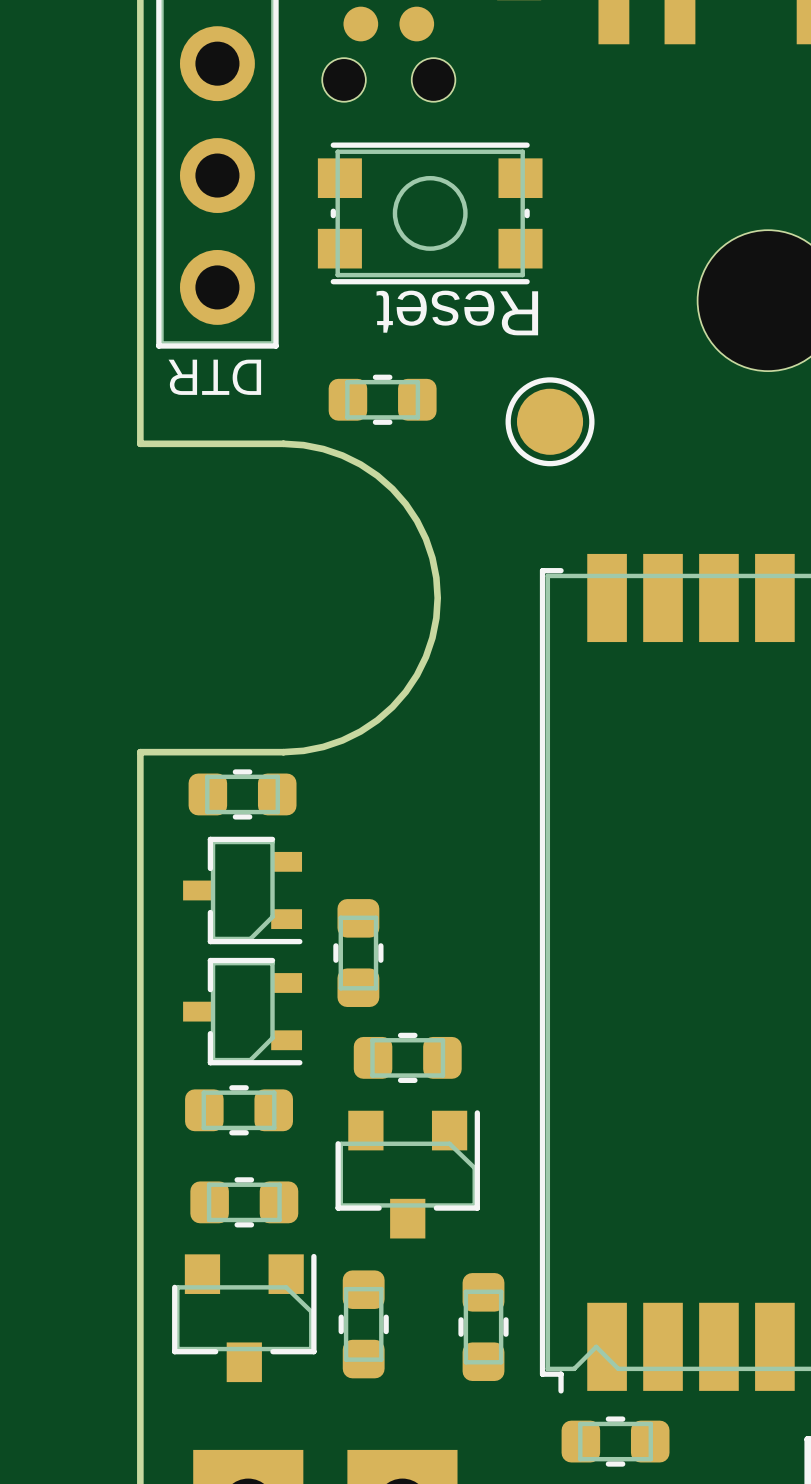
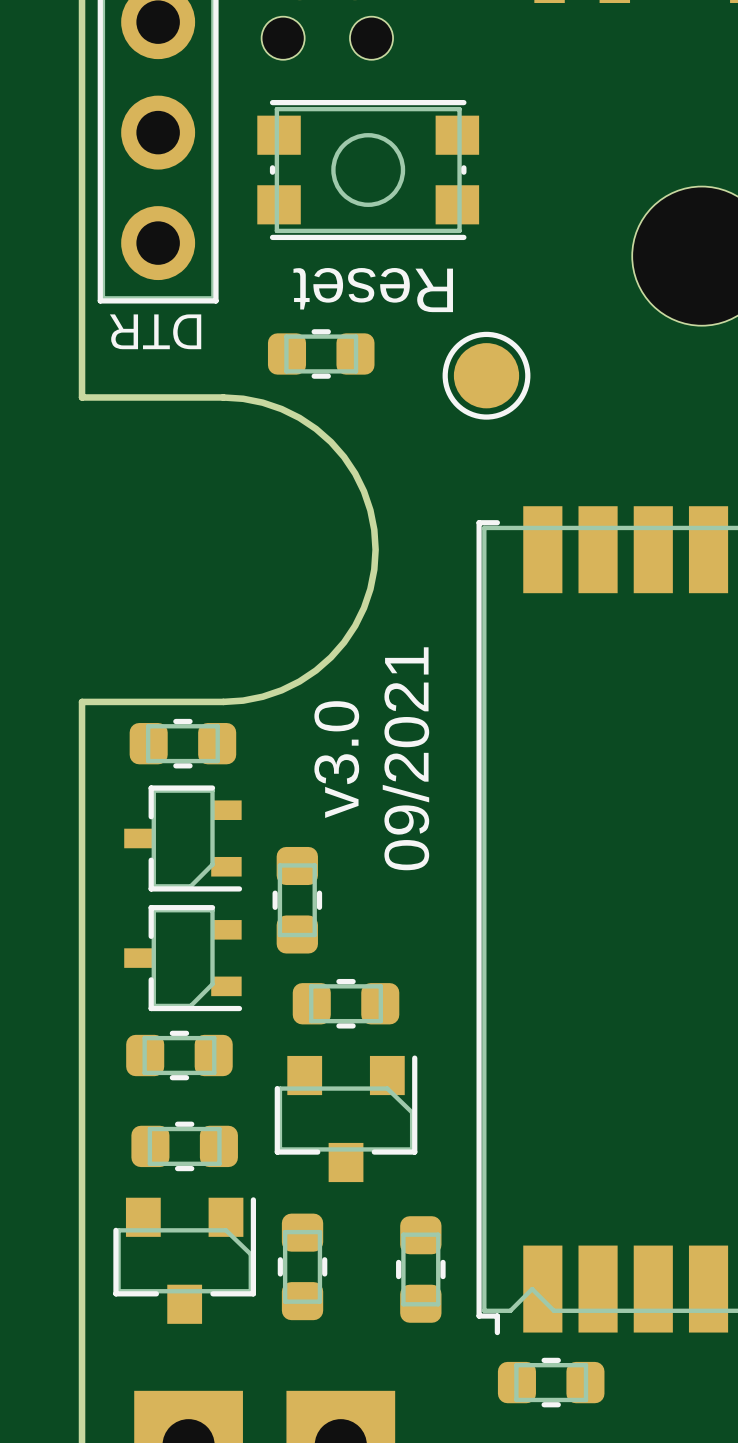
text position: Reset (457, 312) -> Reset (373, 290)
text: none -> 09/2021 (405, 758)
text: none -> v3.0 (336, 759)

